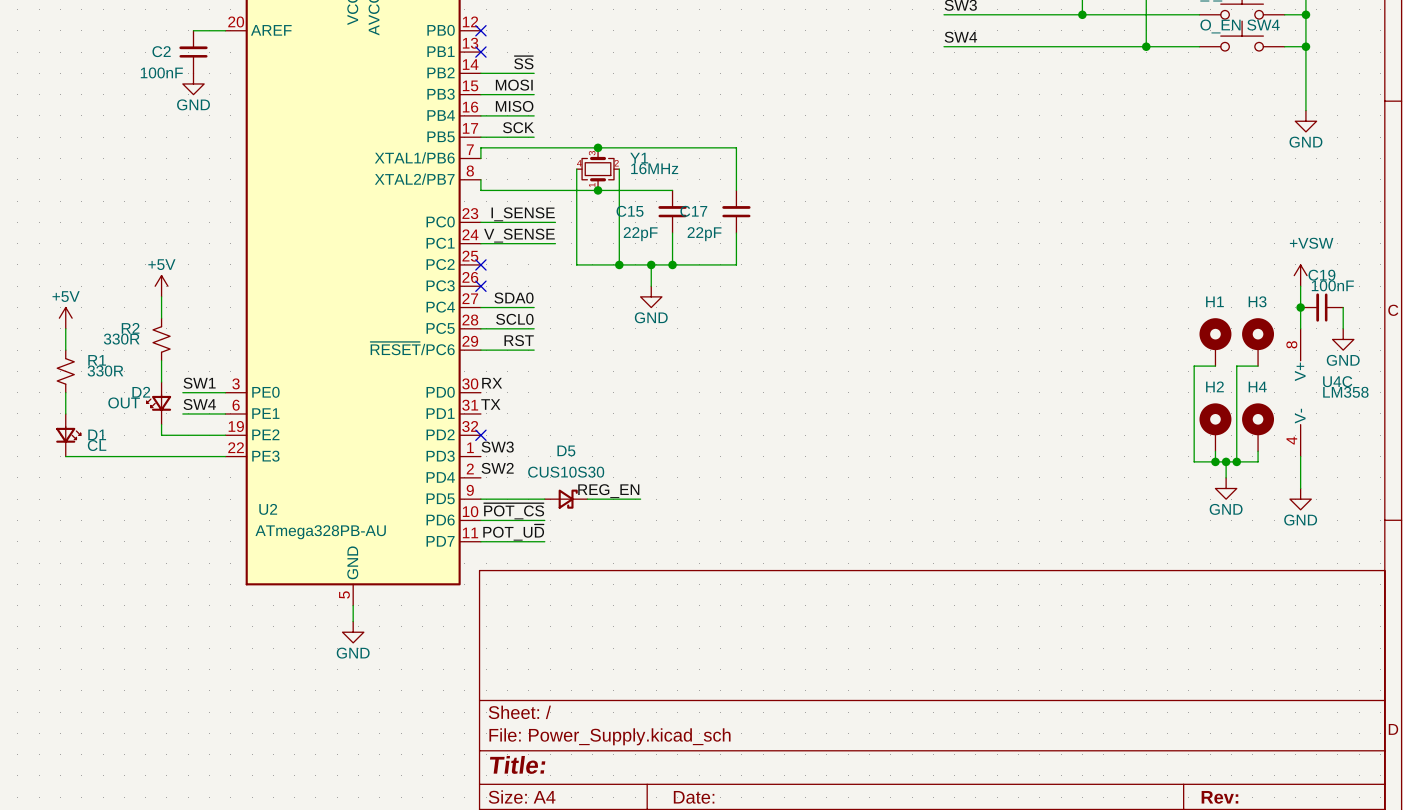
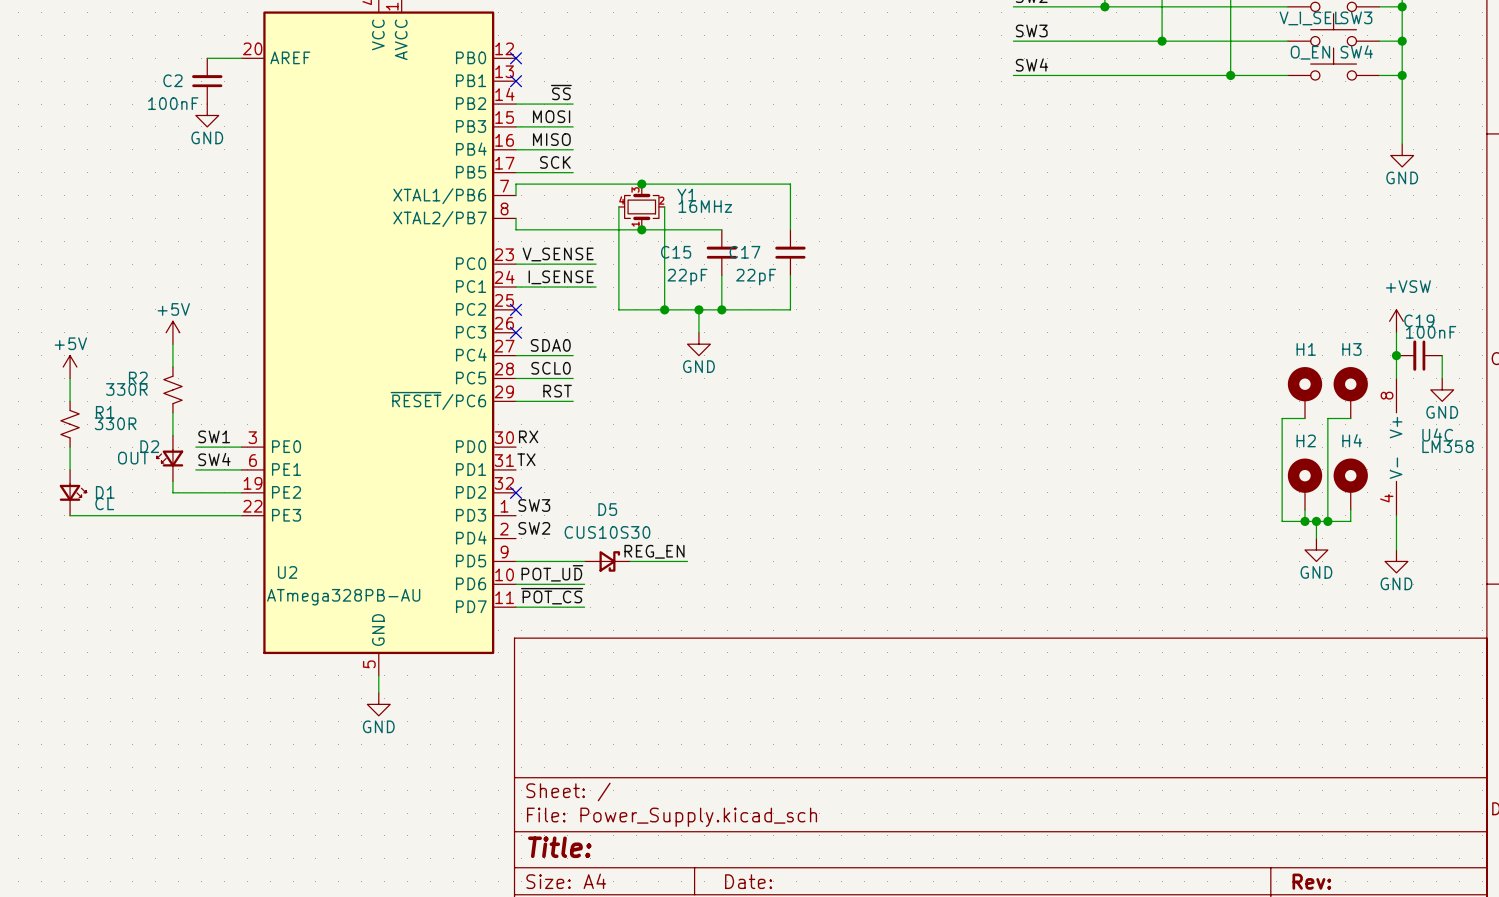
label: I_SENSE (523, 214) -> V_SENSE (558, 254)
label: V_SENSE (519, 235) -> I_SENSE (561, 277)
label: ~{POT_CS} (514, 511) -> POT_U~{D} (552, 573)
label: POT_U~{D} (513, 532) -> ~{POT_CS} (552, 596)

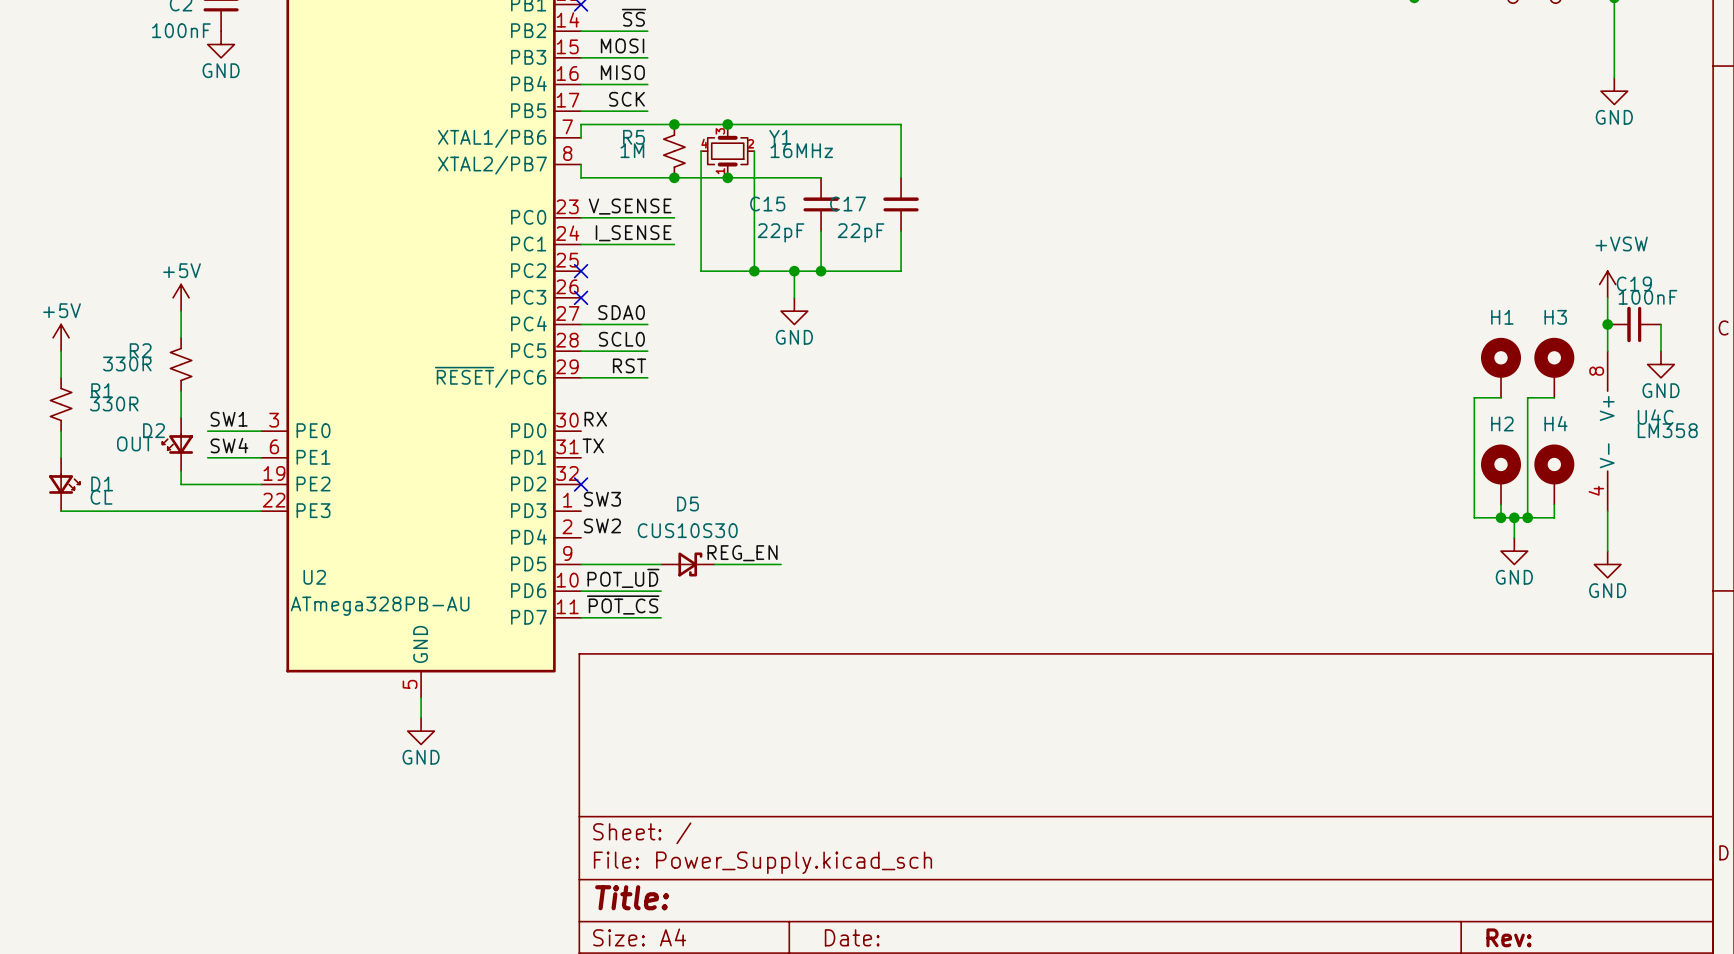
junction: none -> (674, 124)
R5: none -> 1M (674, 151)
junction: none -> (674, 177)

